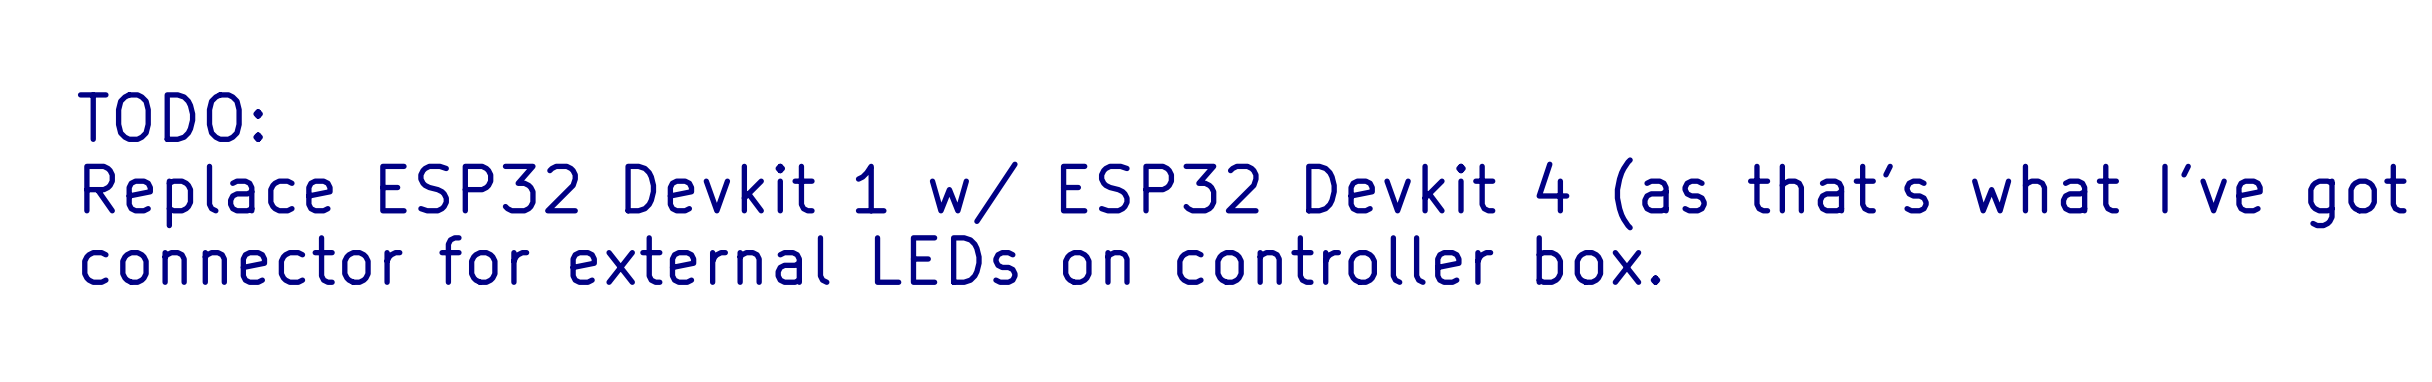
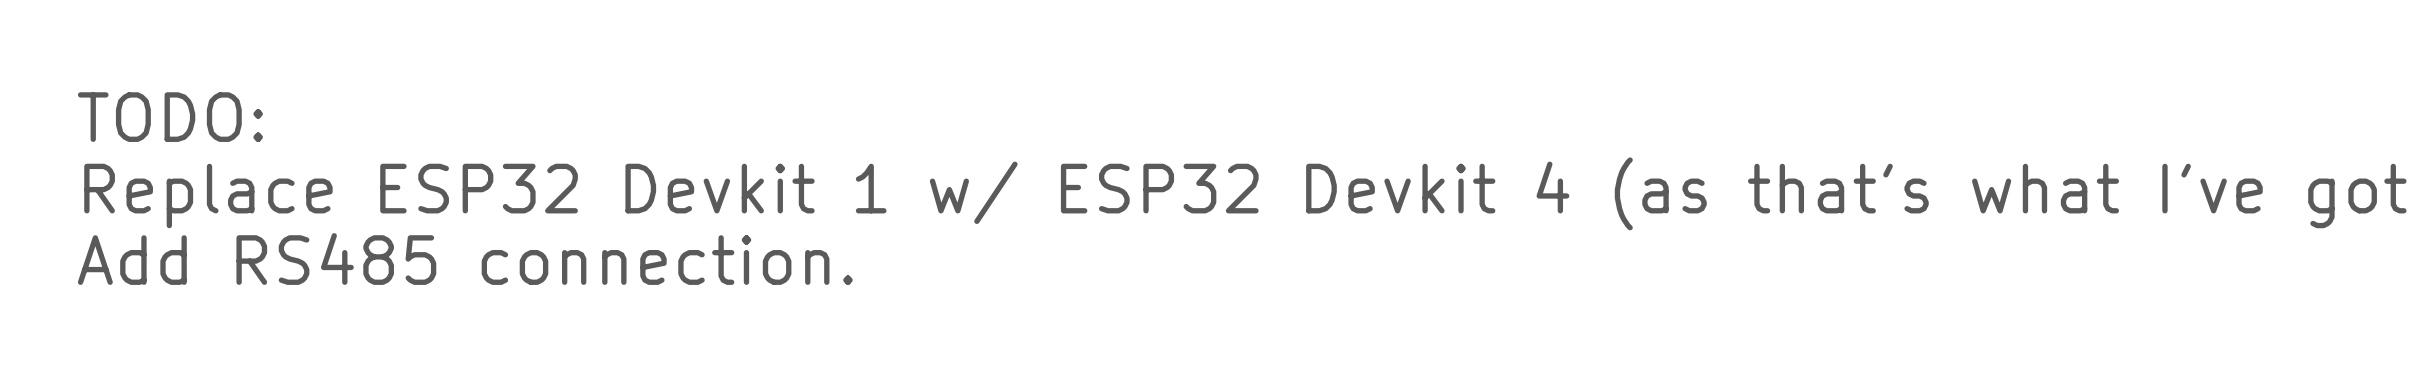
text: connector for external LEDs on controller box. (871, 260) -> Add RS485 connection. (465, 259)

